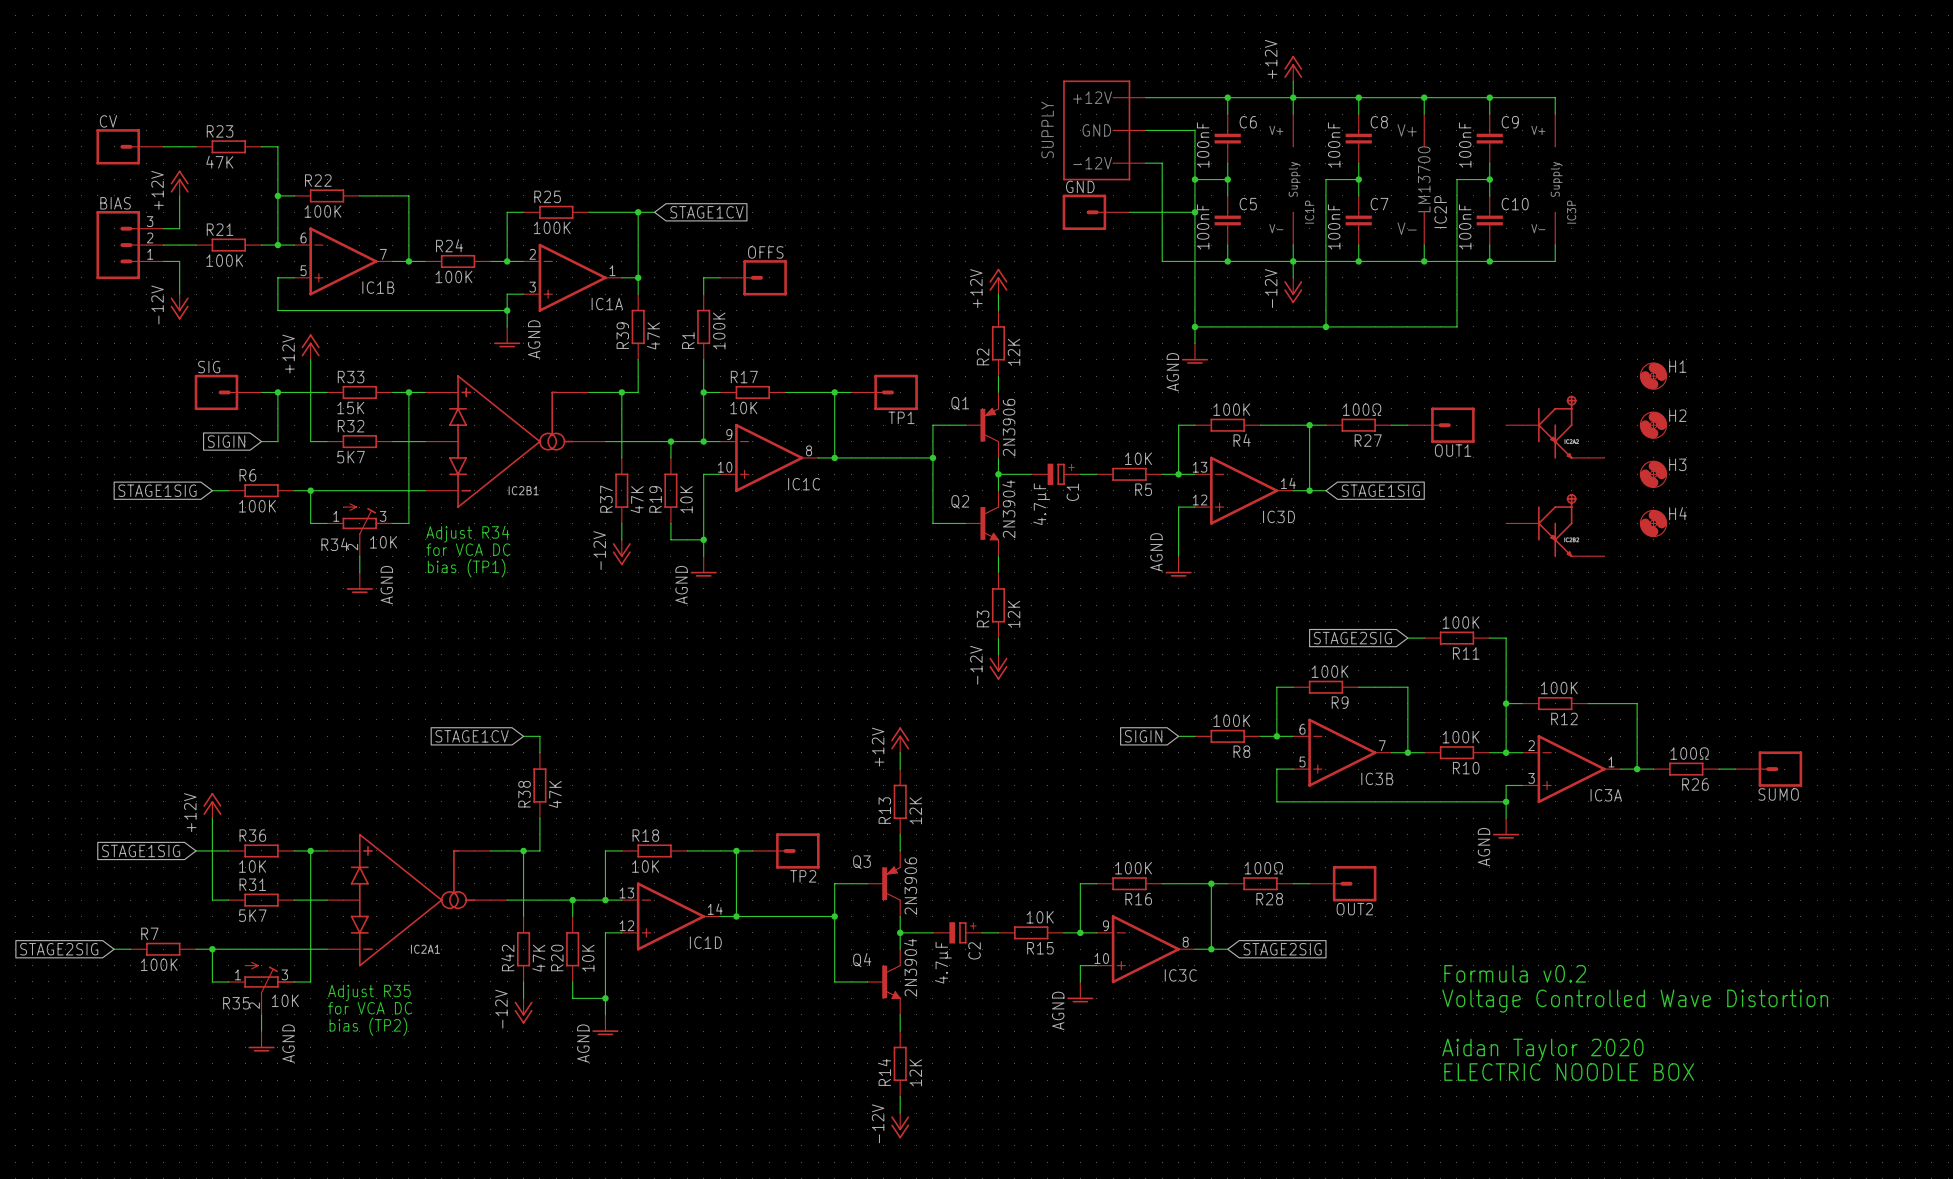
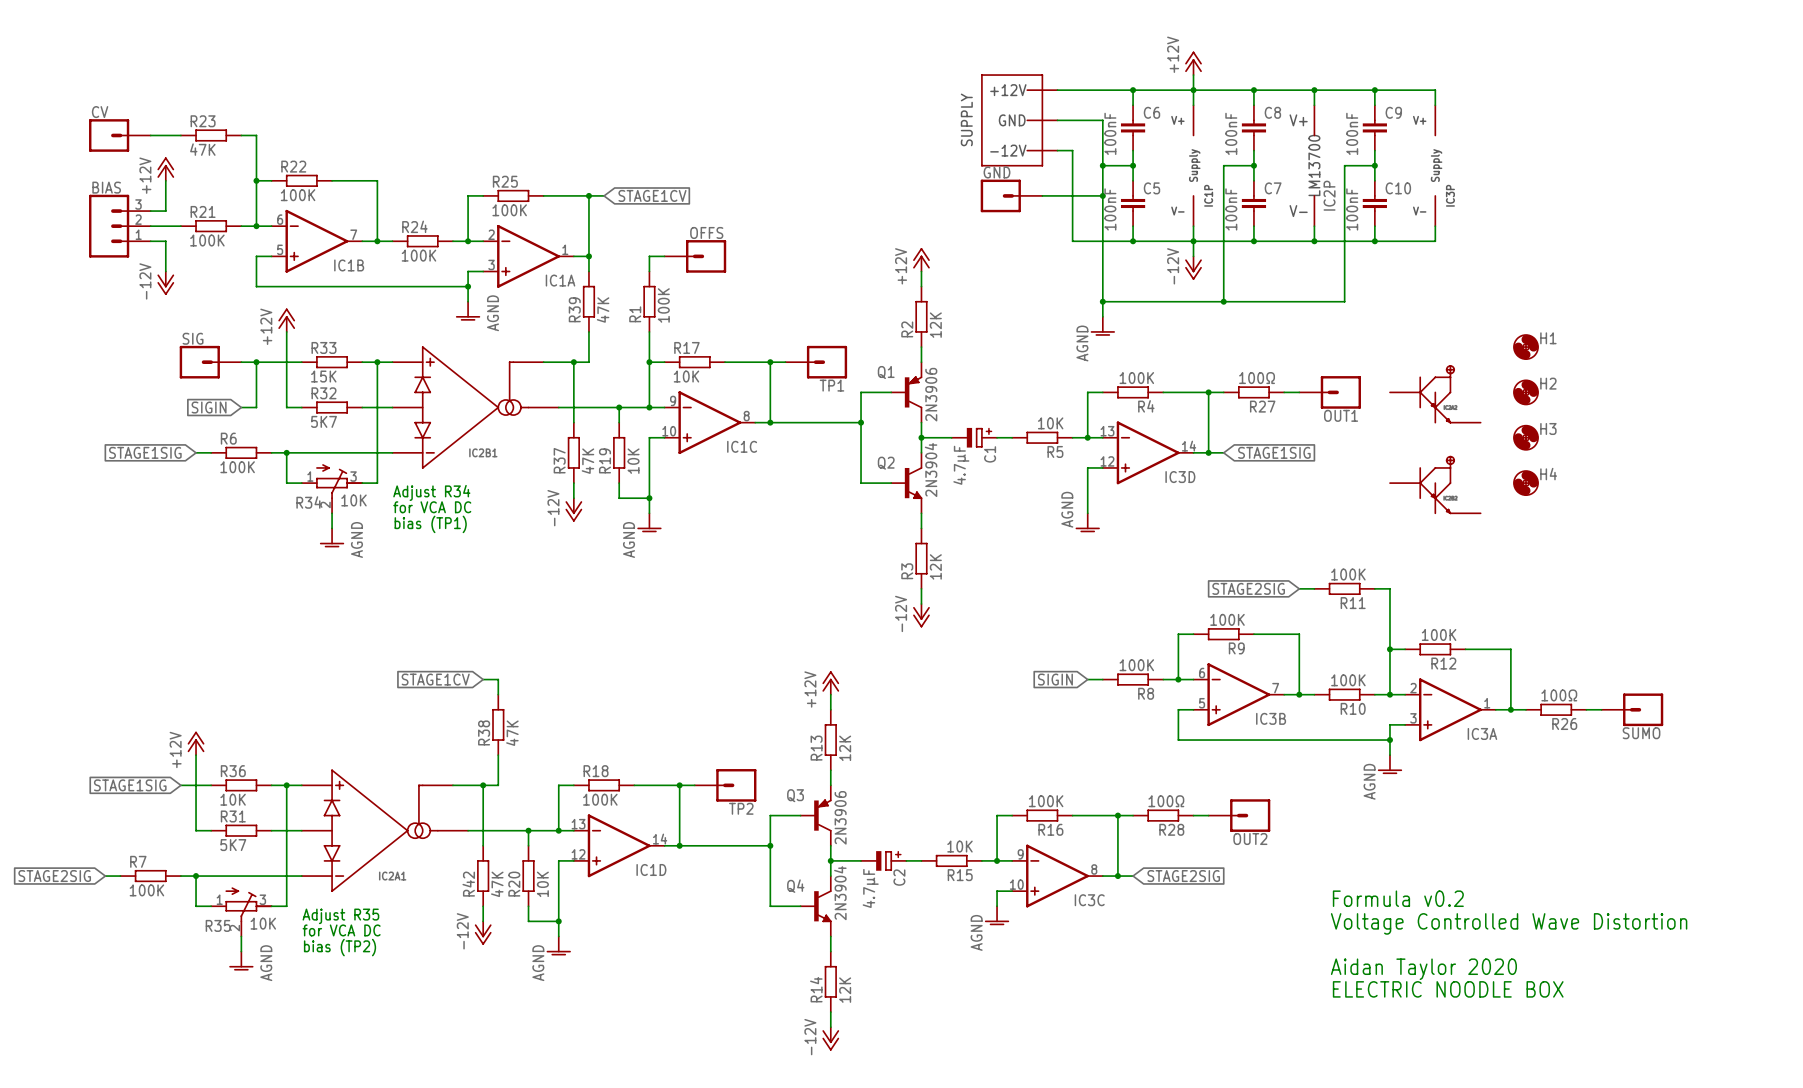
R18 value: 10K (645, 866) -> 100K (600, 799)

